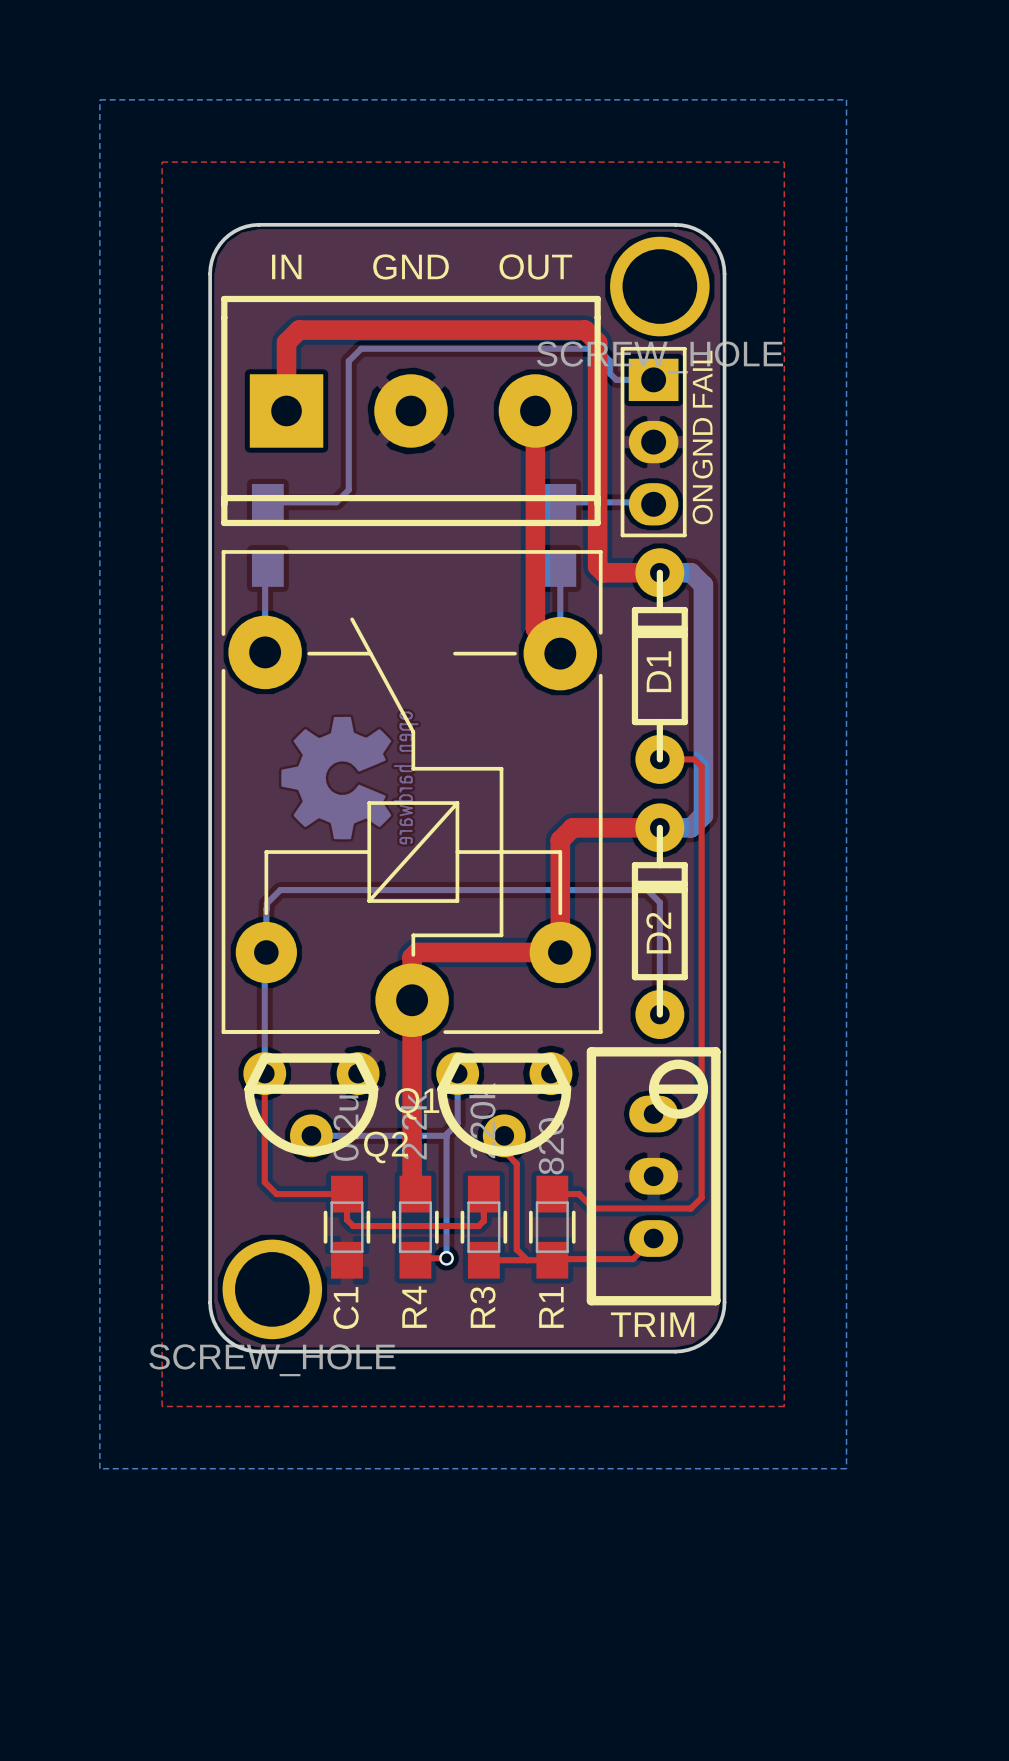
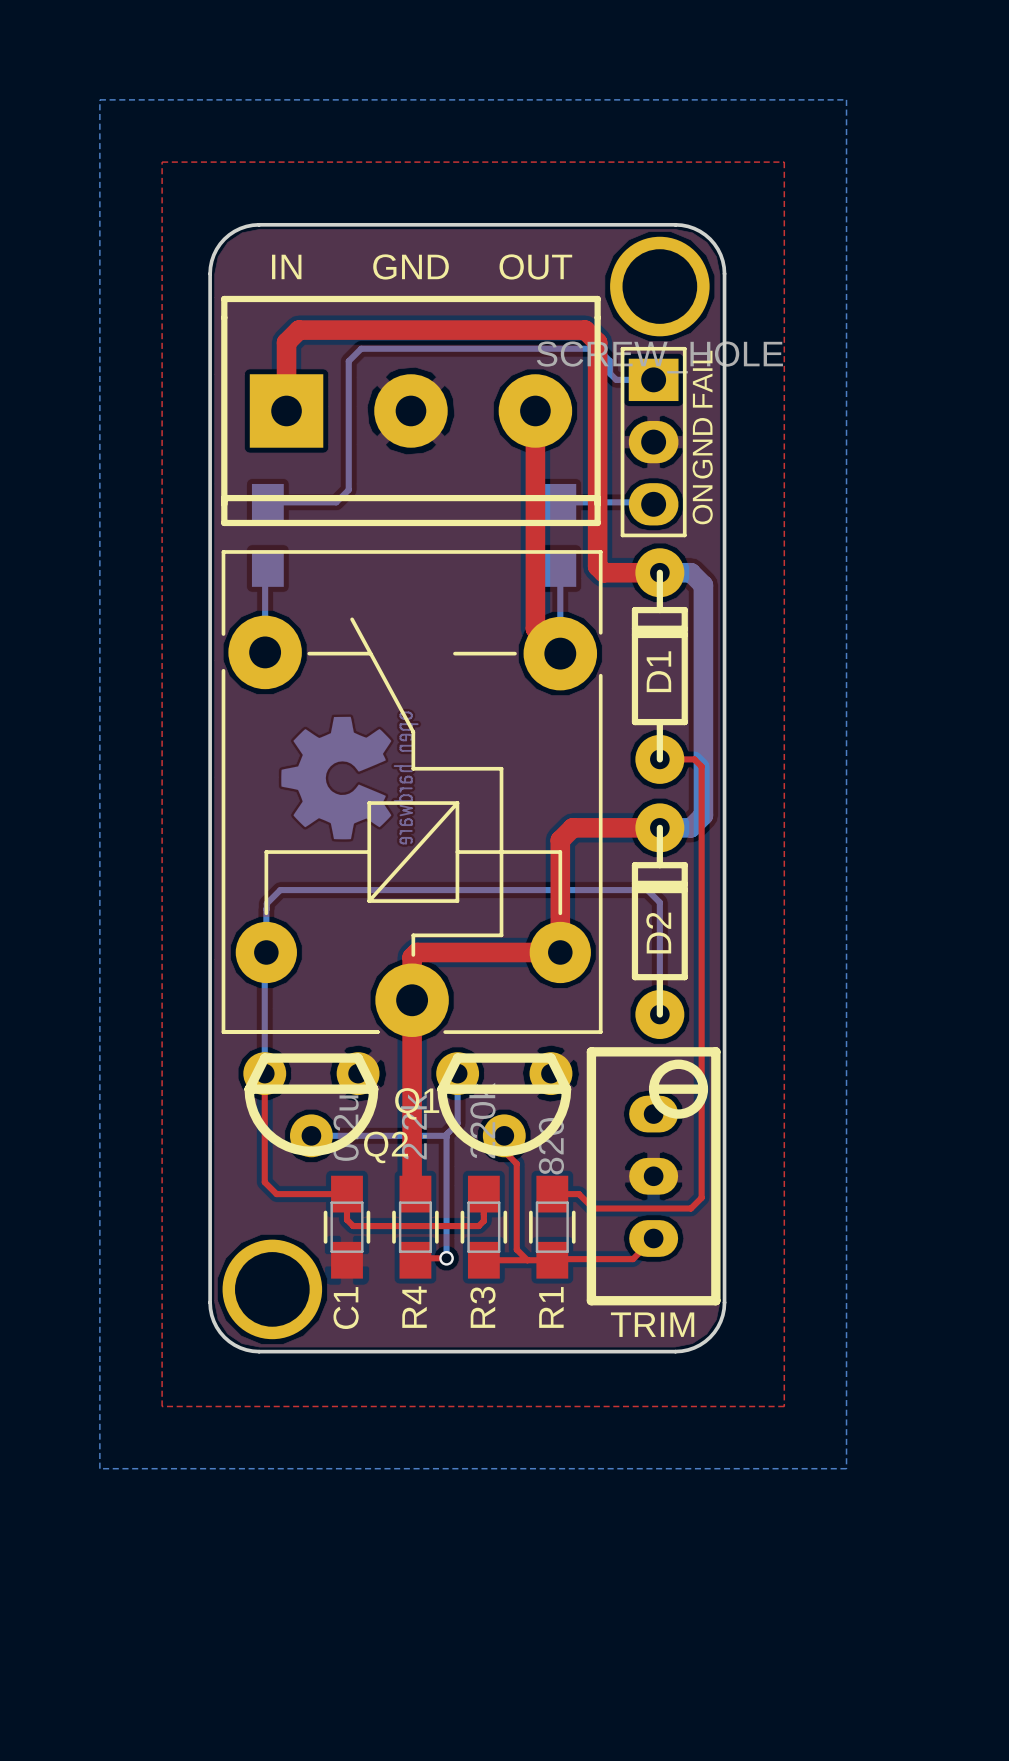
part value: SCREW_HOLE (272, 1360) -> none

